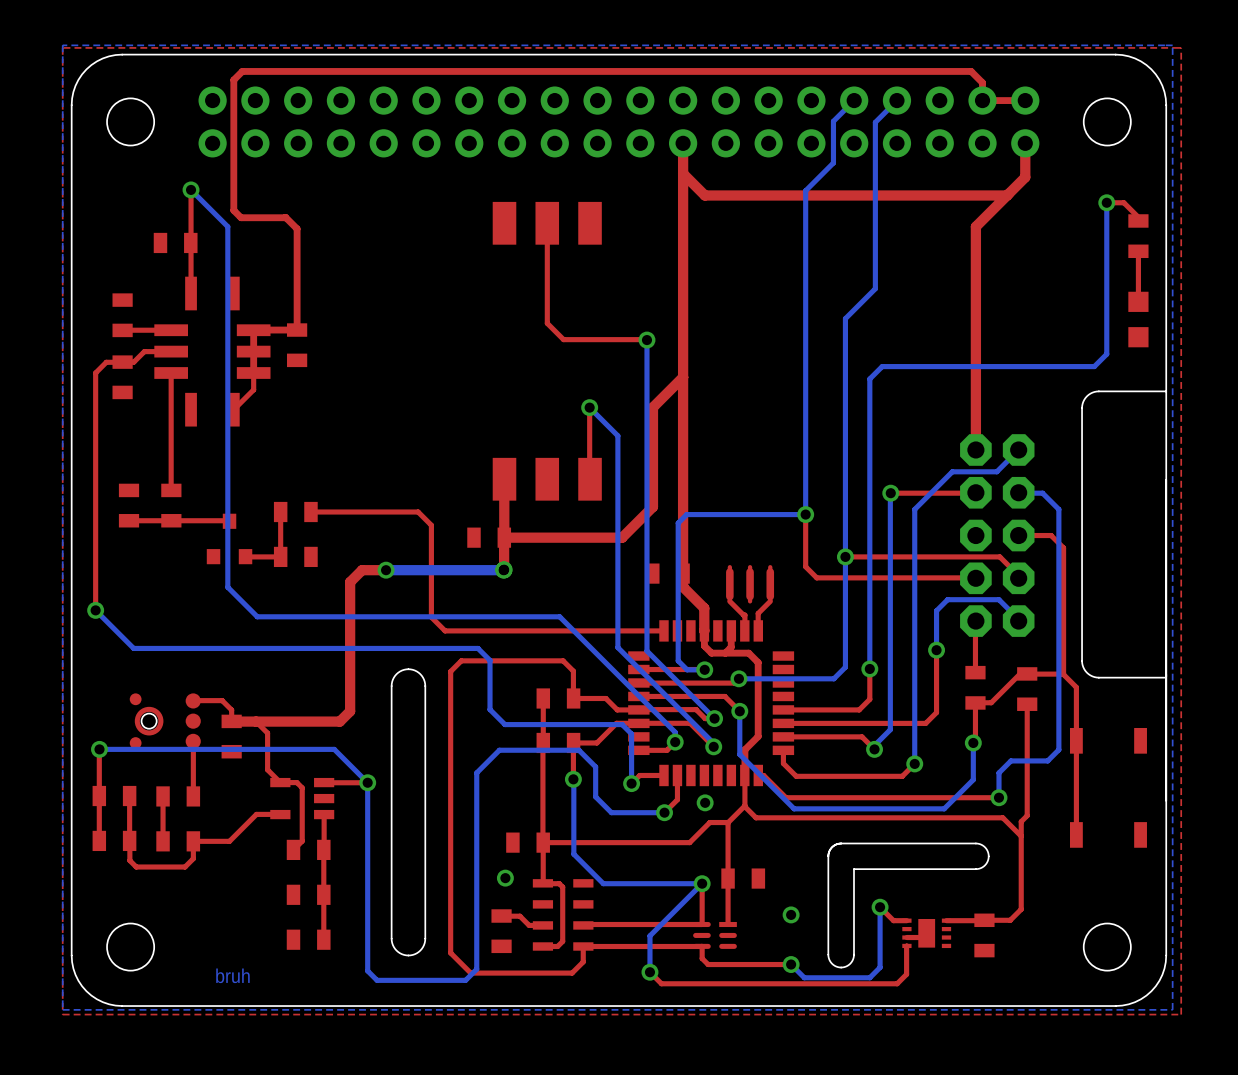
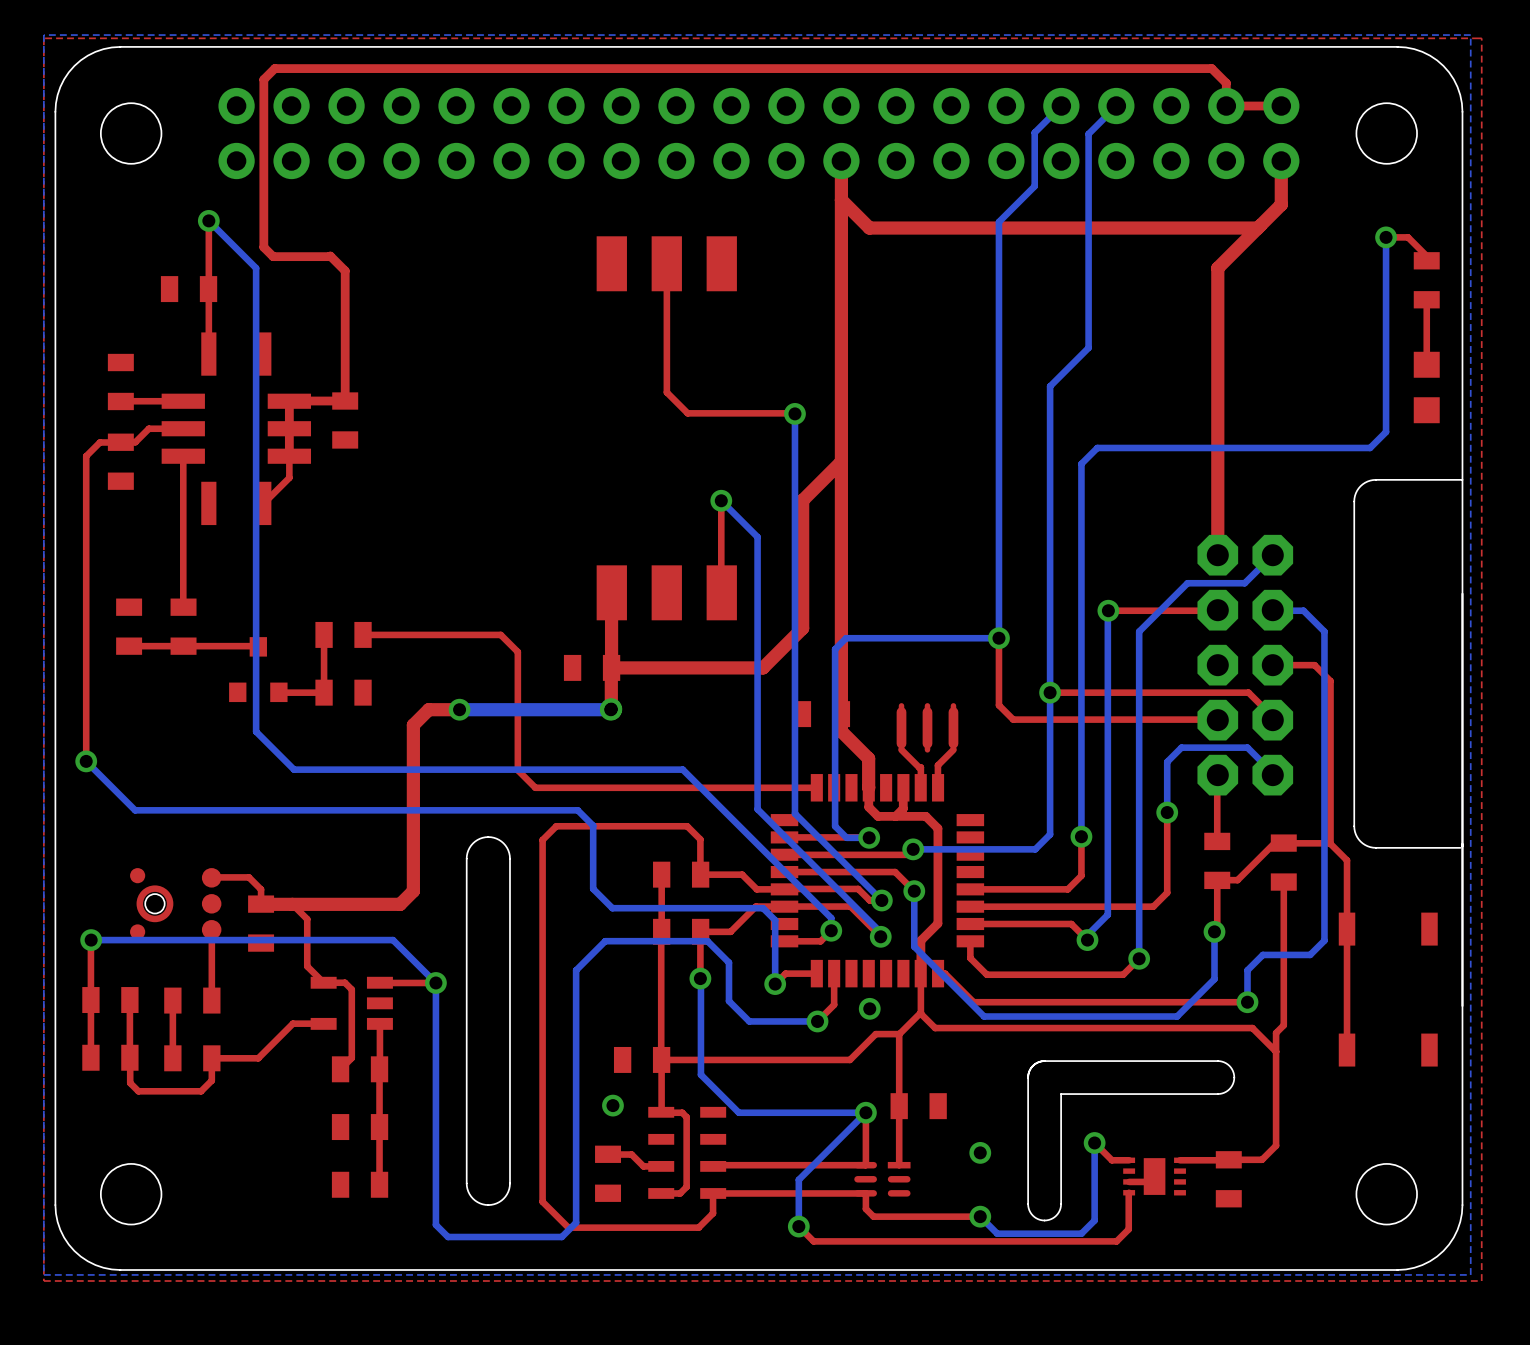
text: bruh (232, 975) -> none

